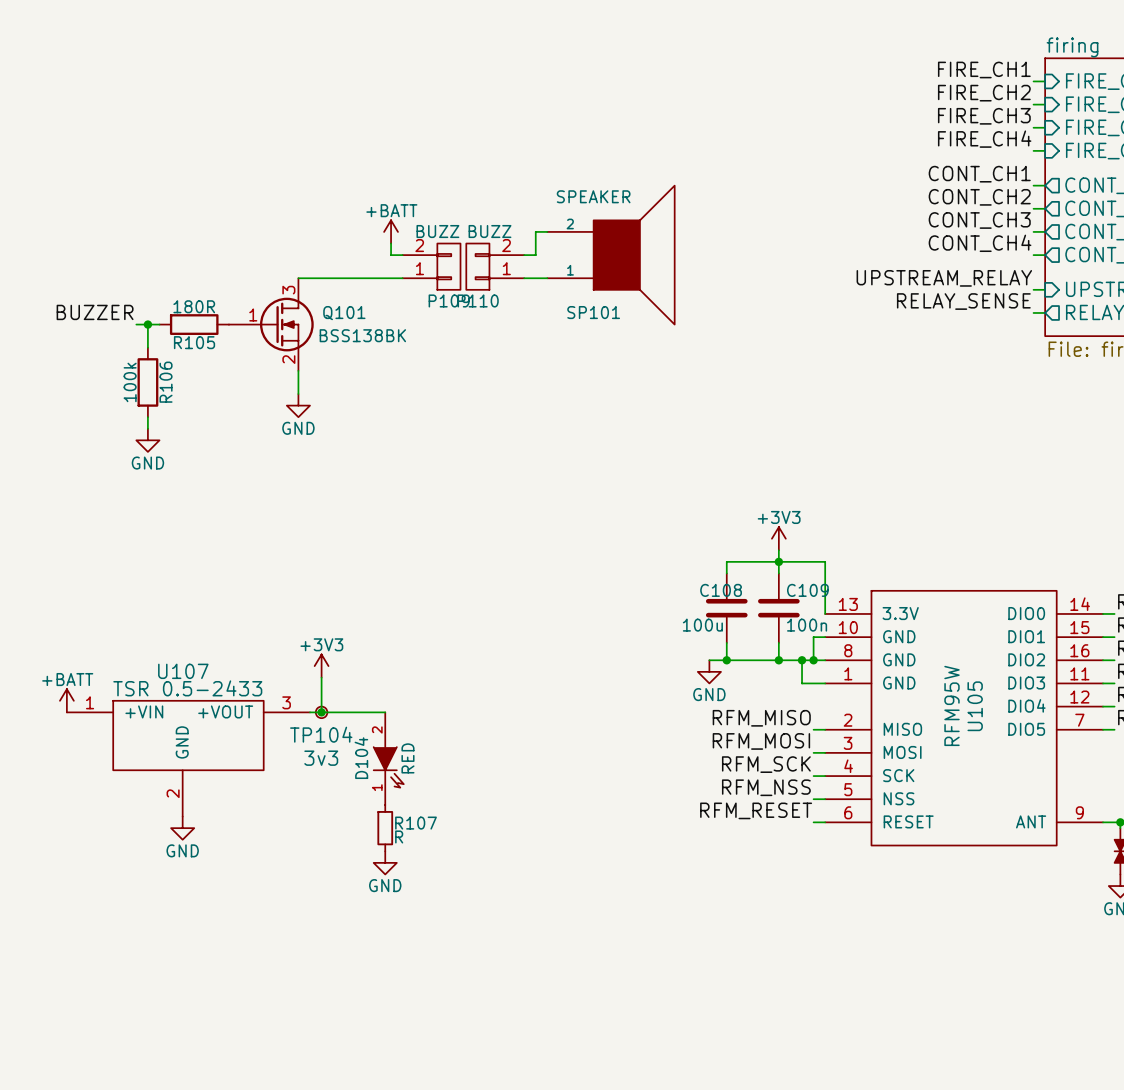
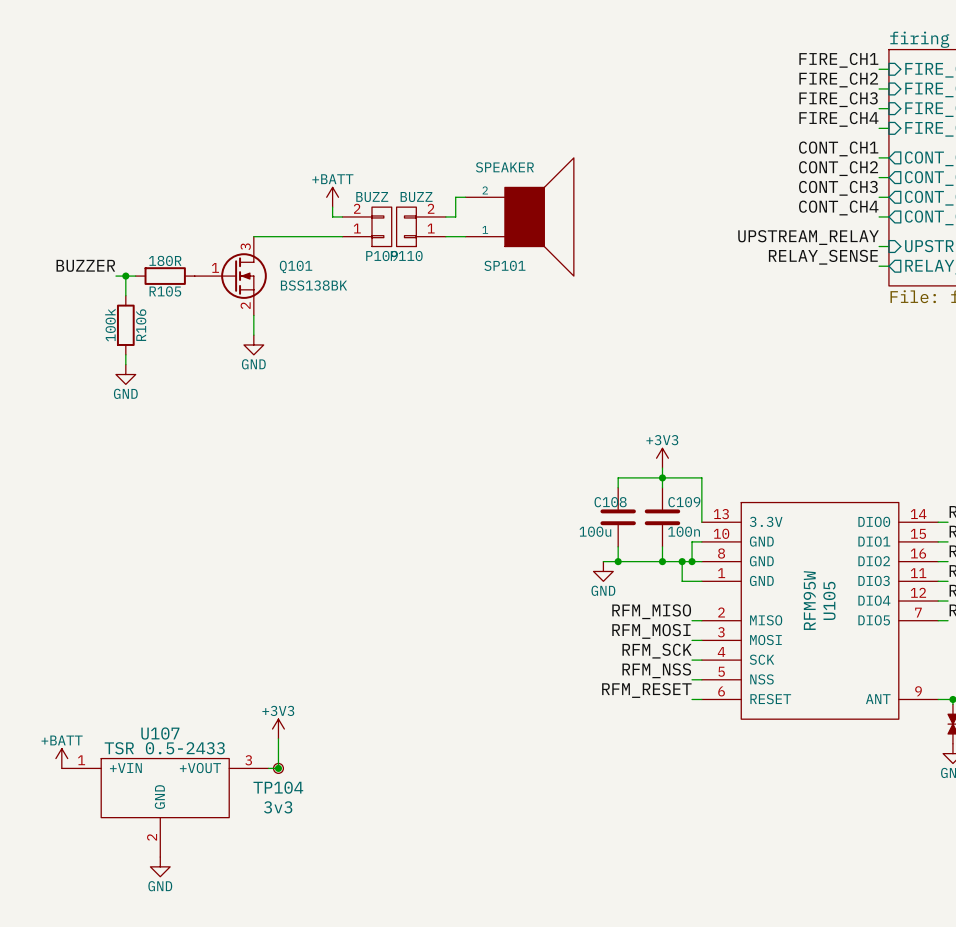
power symbol position: +3V3 (321, 666) -> +3V3 (278, 729)
wire: (321, 677) (321, 712) -> none
power symbol position: +BATT (66, 700) -> +BATT (61, 758)
wire: (310, 712) (385, 712) -> none
TP104 position: (321, 712) -> (278, 768)
junction: (321, 712) -> none
U107 position: (188, 758) -> (165, 807)
D104: RED (388, 758) -> none
power symbol: GND (182, 828) -> none
R107: R (385, 828) -> none
power symbol: GND (385, 862) -> none
wire: none -> (278, 738) (278, 768) (268, 768)
junction: none -> (278, 768)
power symbol: none -> GND (160, 866)

